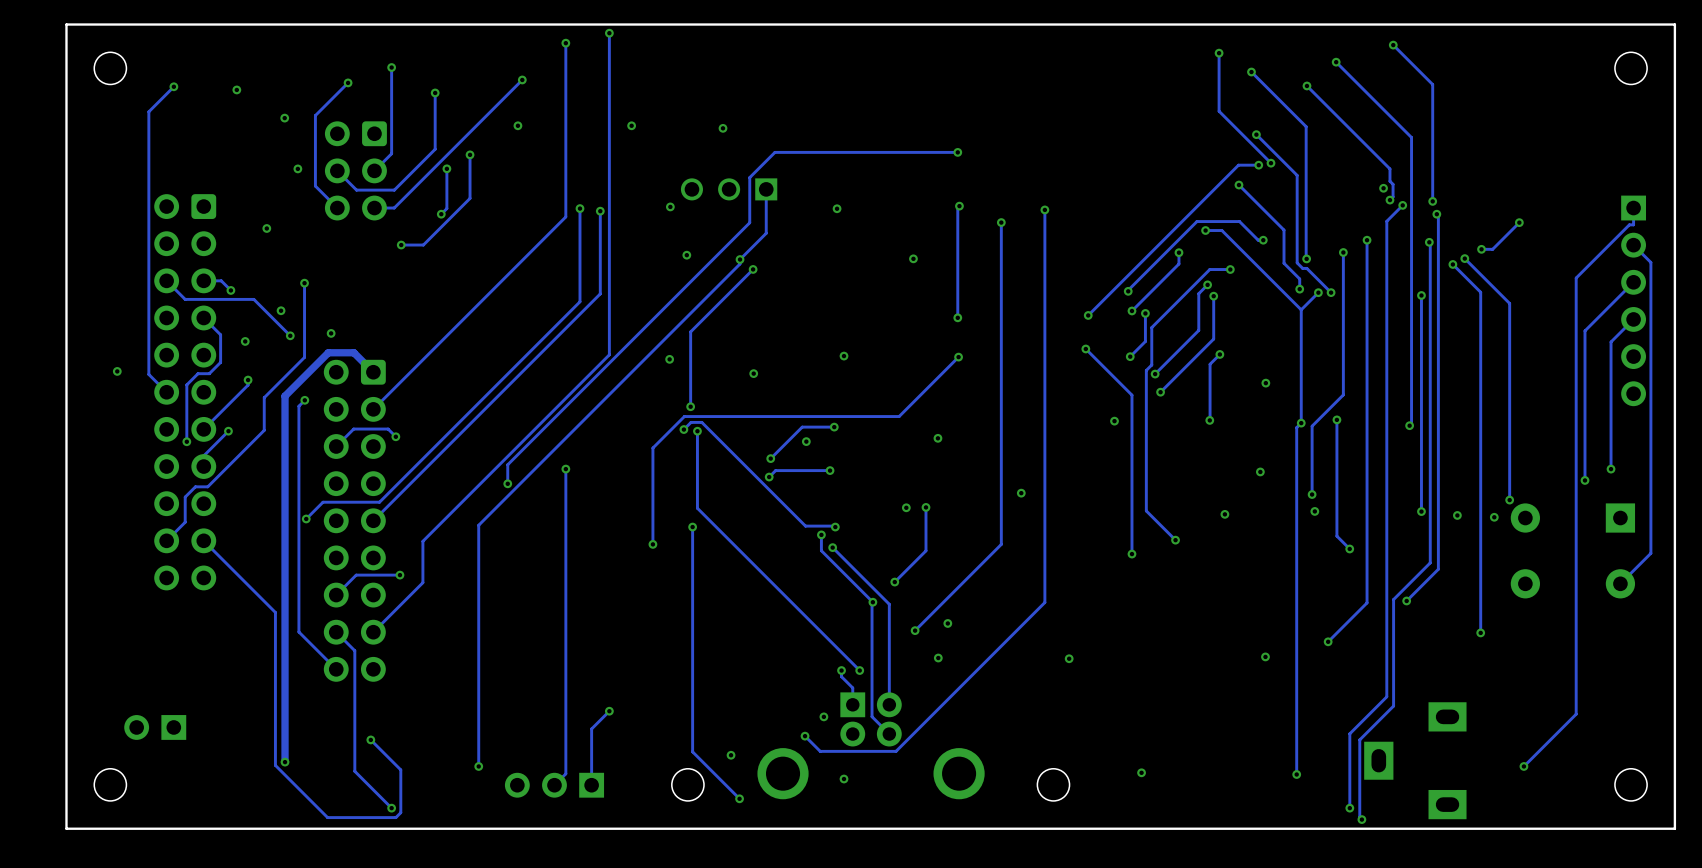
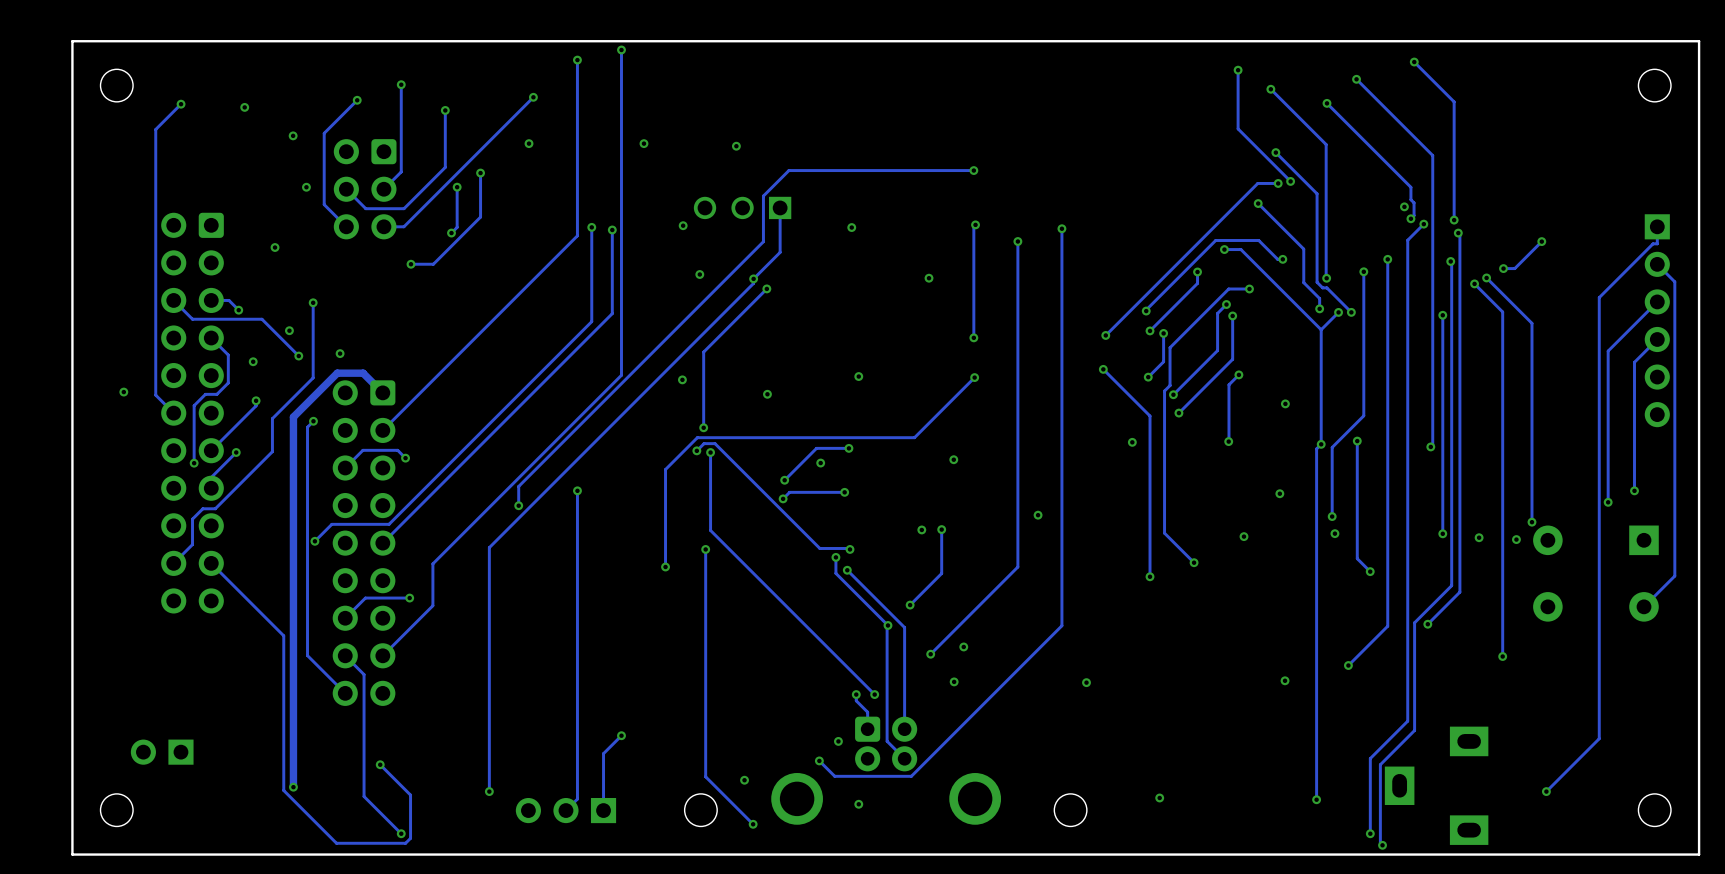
part footprint: [757, 692, 985, 800] -> [771, 716, 1002, 825]

